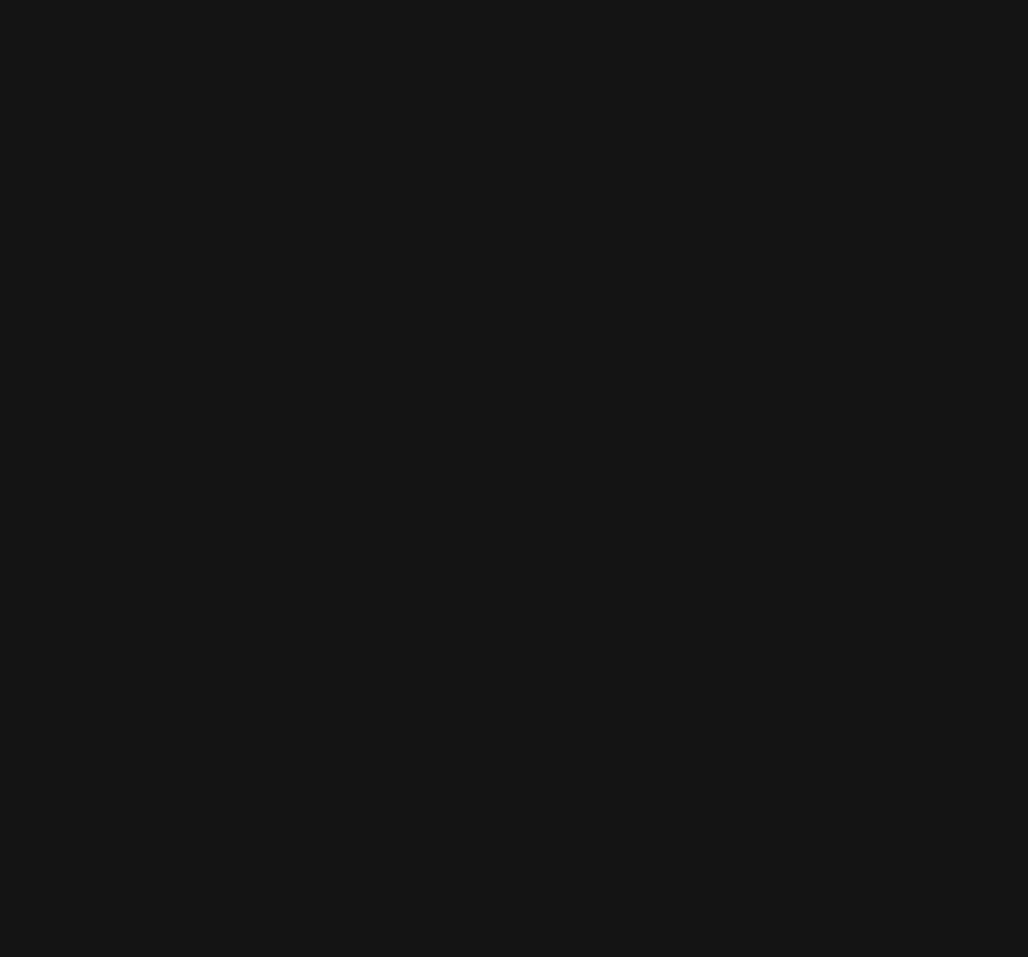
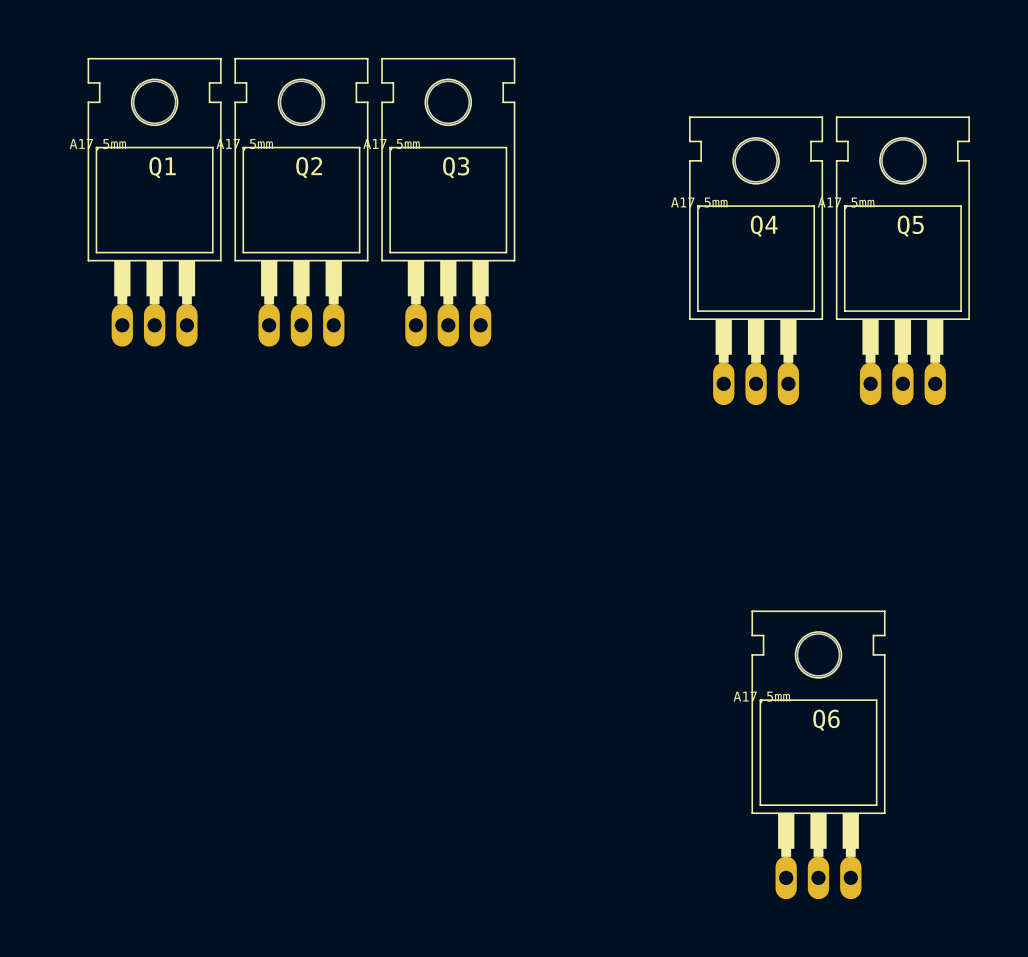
Q1: none -> (154, 202)
Q2: none -> (301, 202)
Q3: none -> (448, 202)
Q4: none -> (756, 260)
Q5: none -> (902, 260)
Q6: none -> (818, 754)

